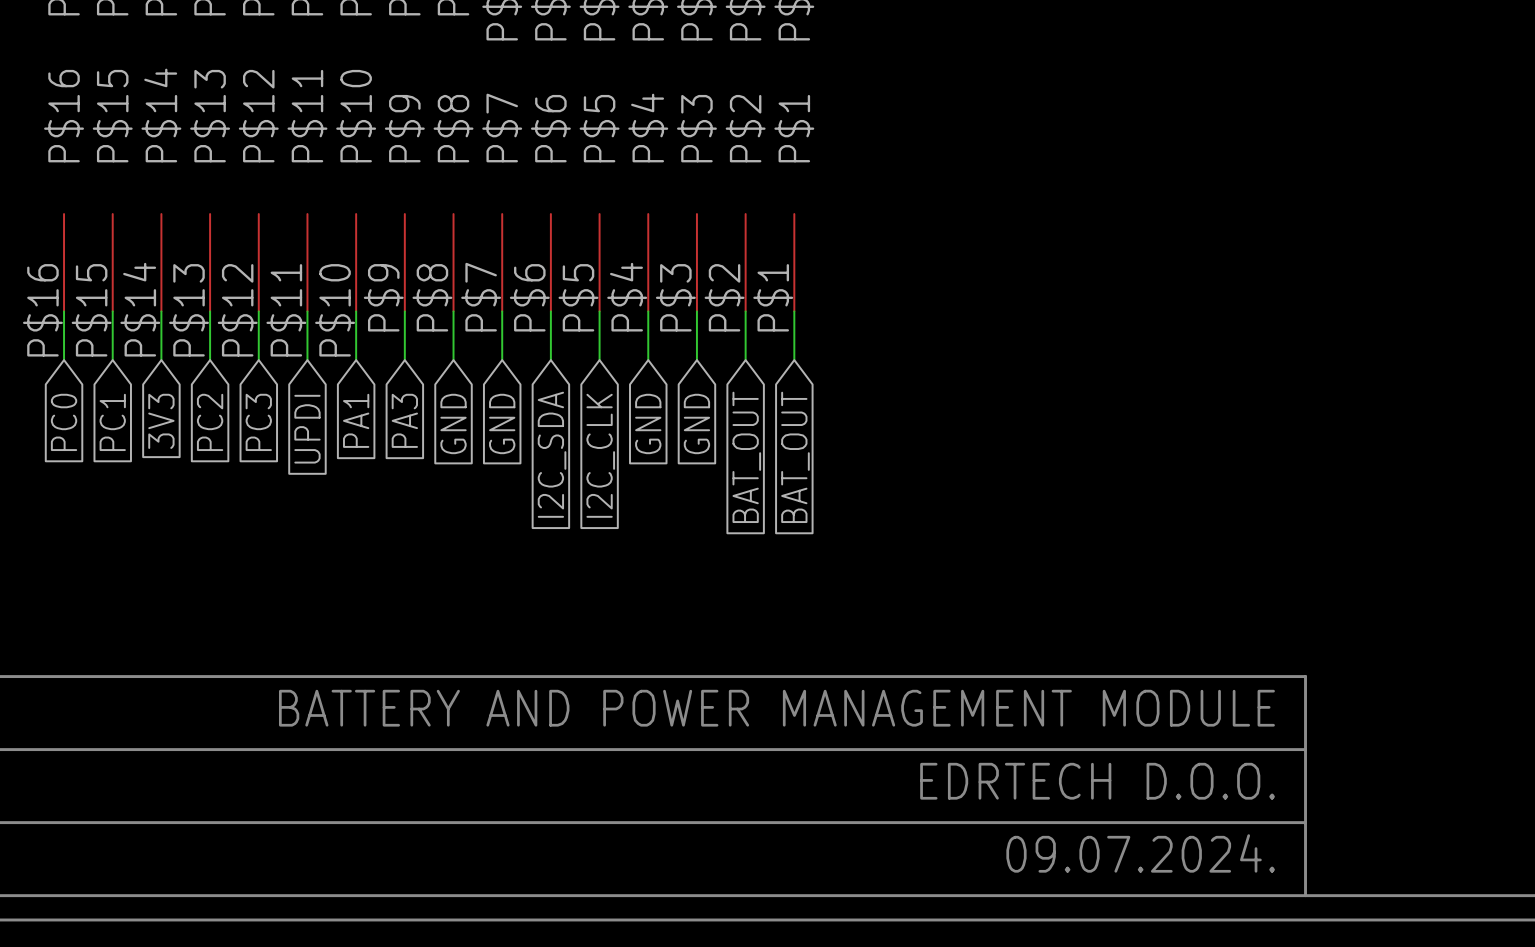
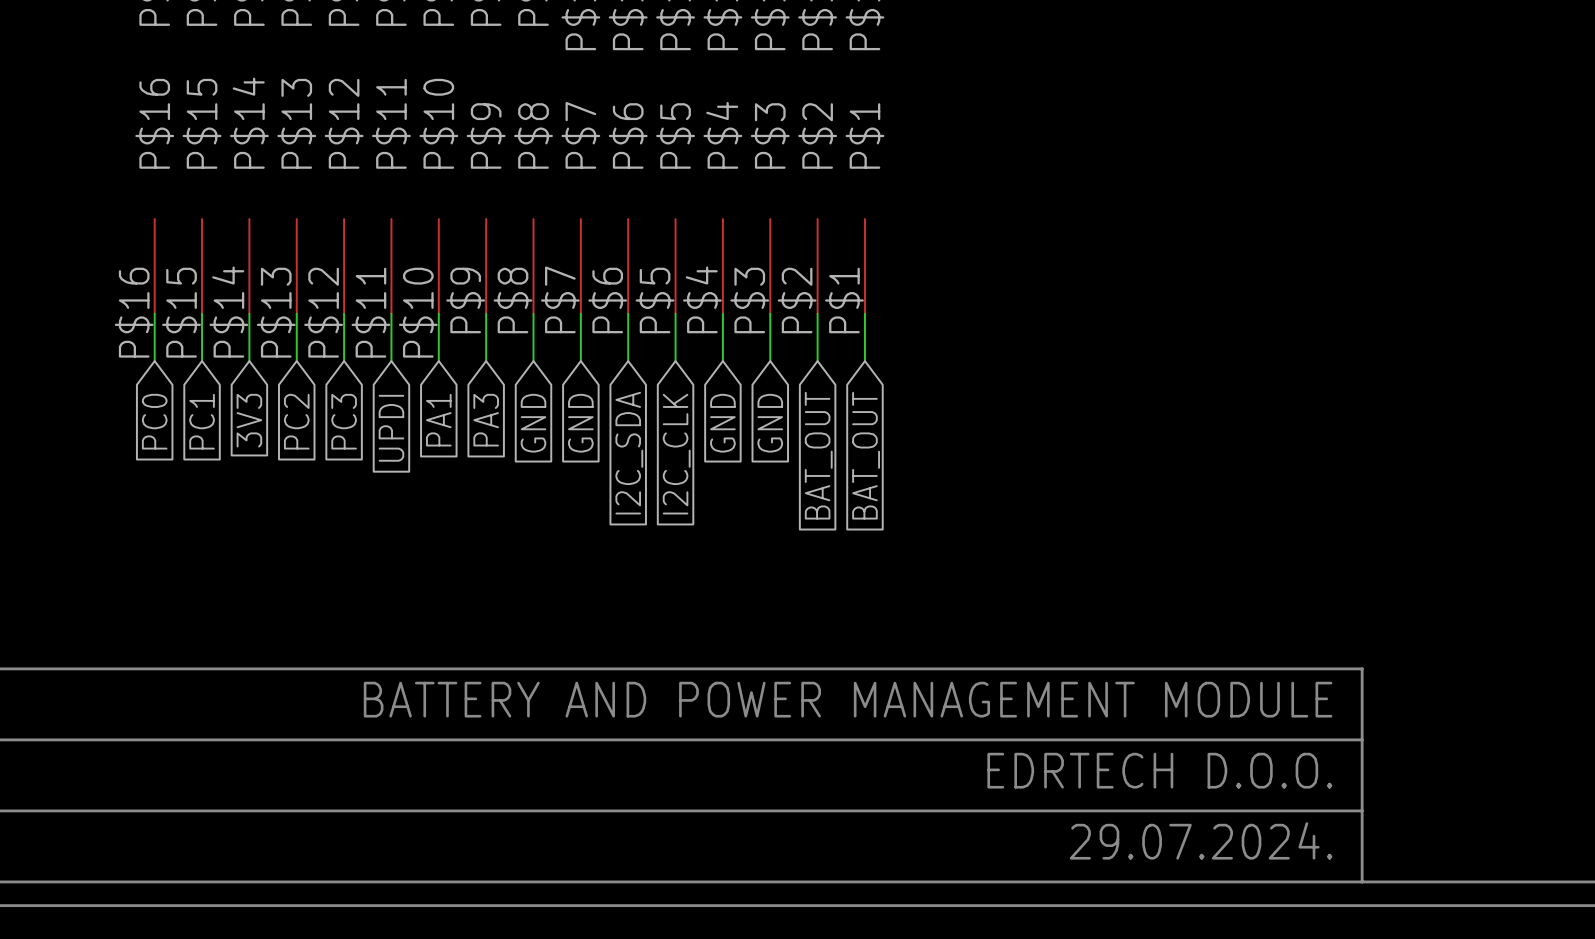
text: 09.07.2024. (1140, 853) -> 29.07.2024. (1201, 840)

